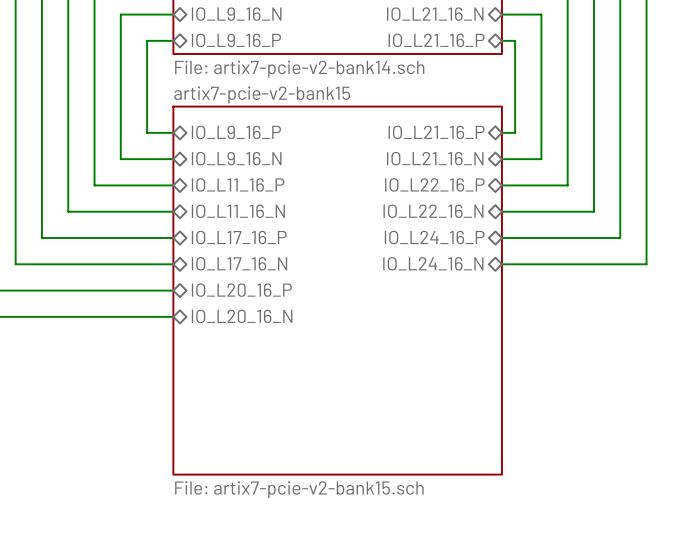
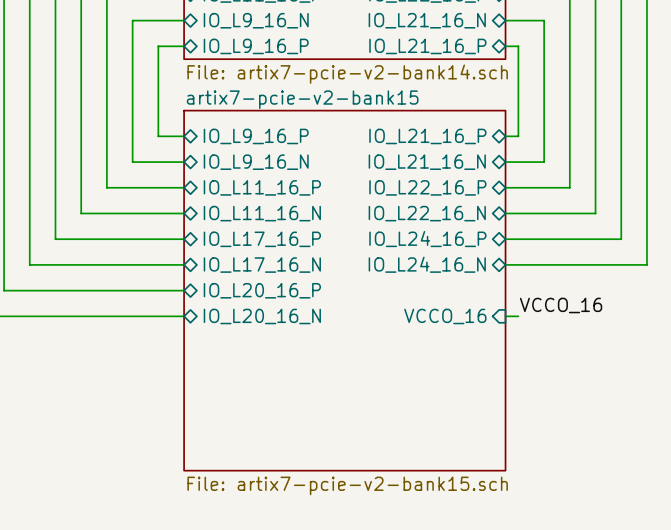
label: none -> VCCO_16 (561, 305)
sheet pin: none -> VCCO_16 (445, 316)
wire: none -> (505, 316) (518, 316)

